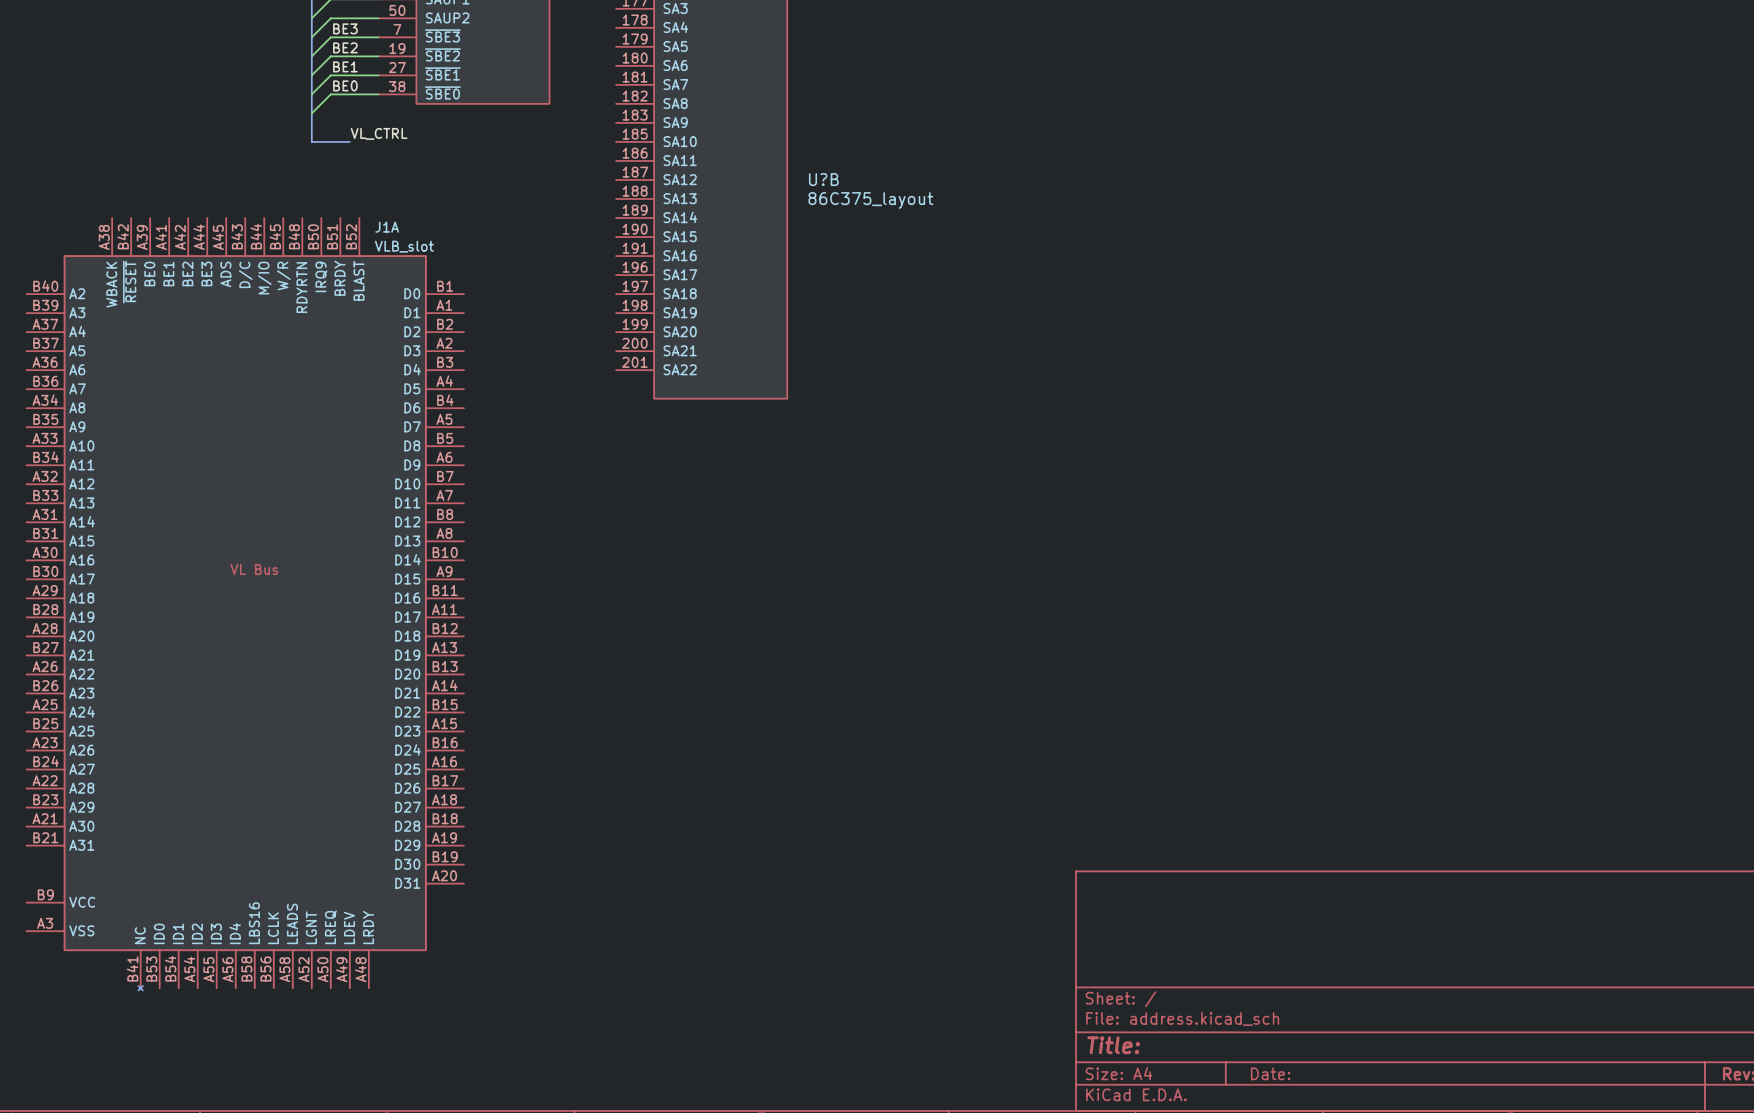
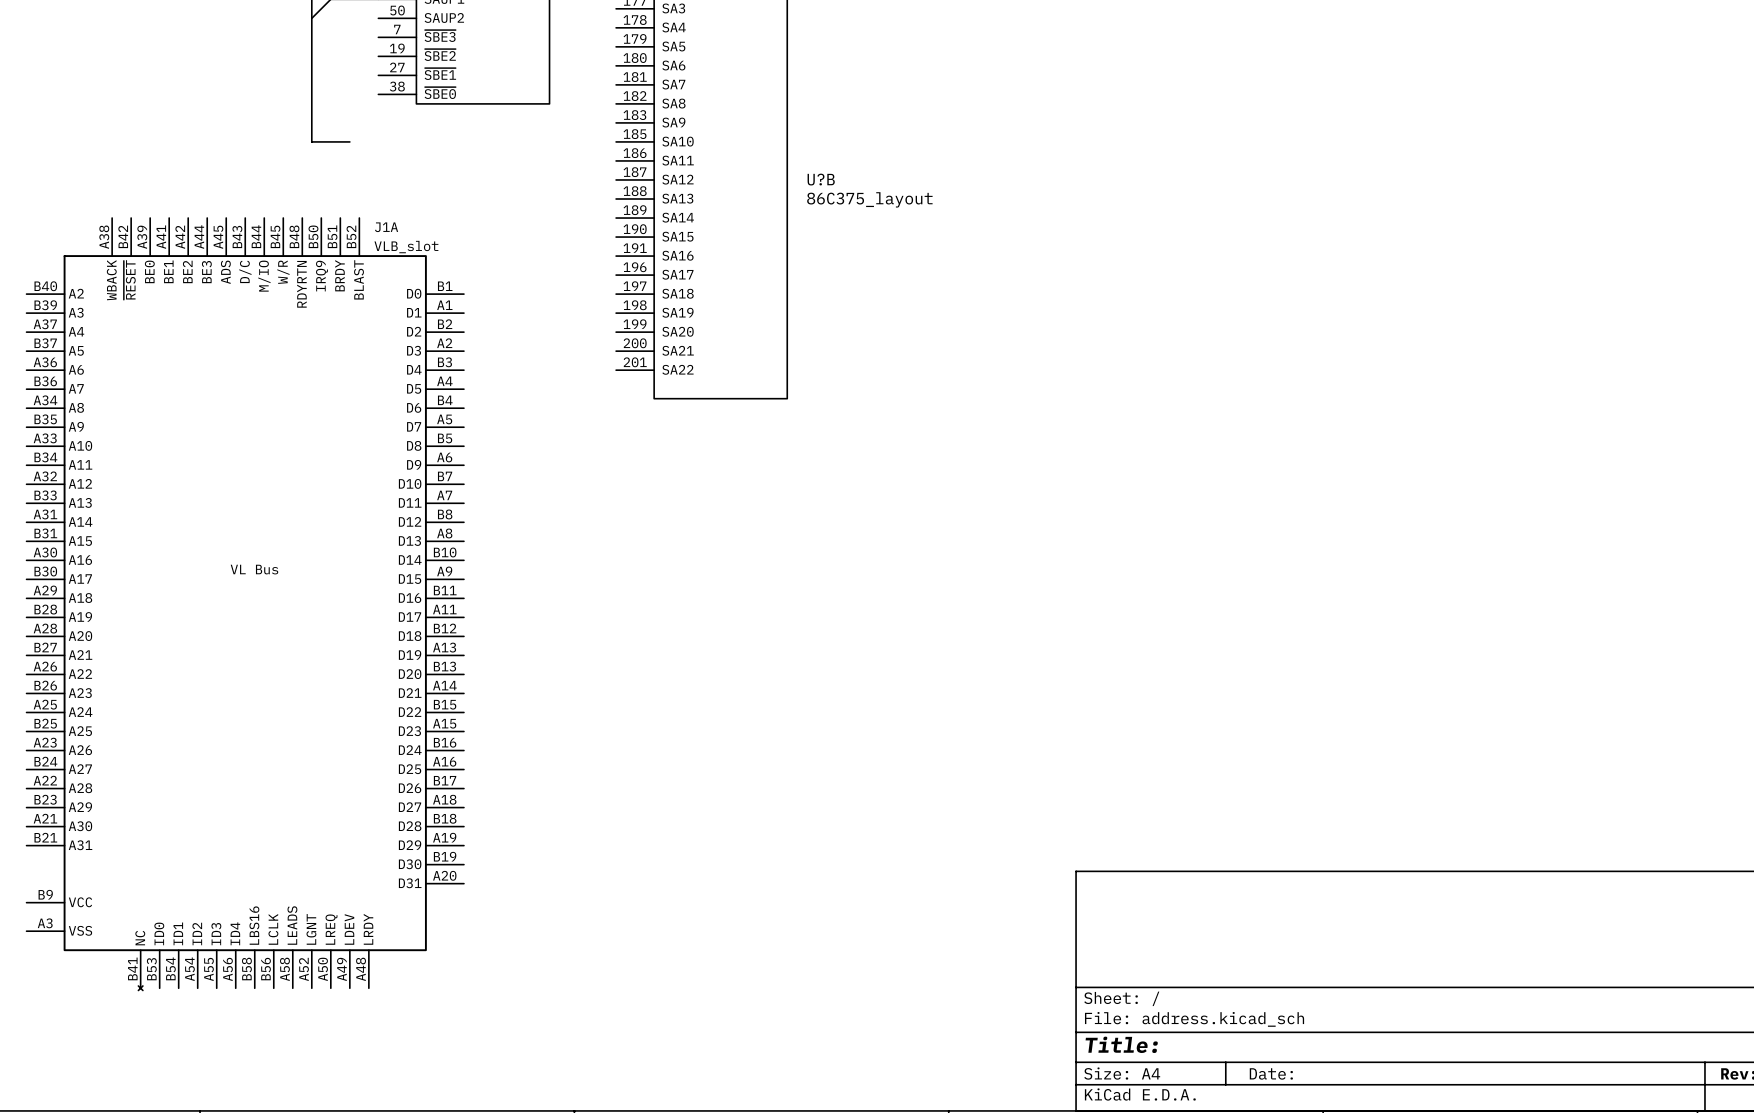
wire: (378, 18) (330, 18) (311, 37) -> none
label: BE3 (345, 28) -> none
wire: (378, 37) (330, 37) (311, 56) -> none
label: BE2 (345, 47) -> none
wire: (378, 56) (330, 56) (311, 75) -> none
label: BE1 (345, 66) -> none
wire: (378, 75) (330, 75) (311, 94) -> none
label: BE0 (345, 85) -> none
wire: (378, 94) (330, 94) (311, 113) -> none
label: VL_CTRL (379, 133) -> none

